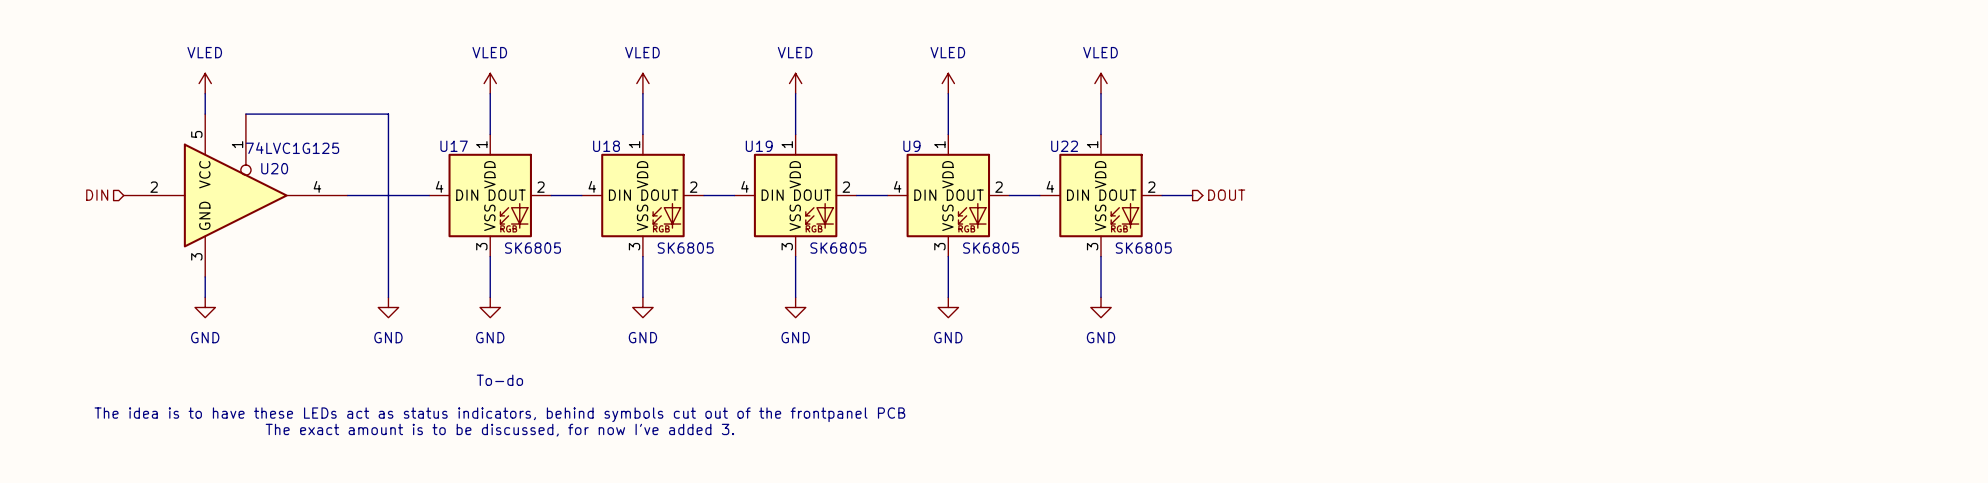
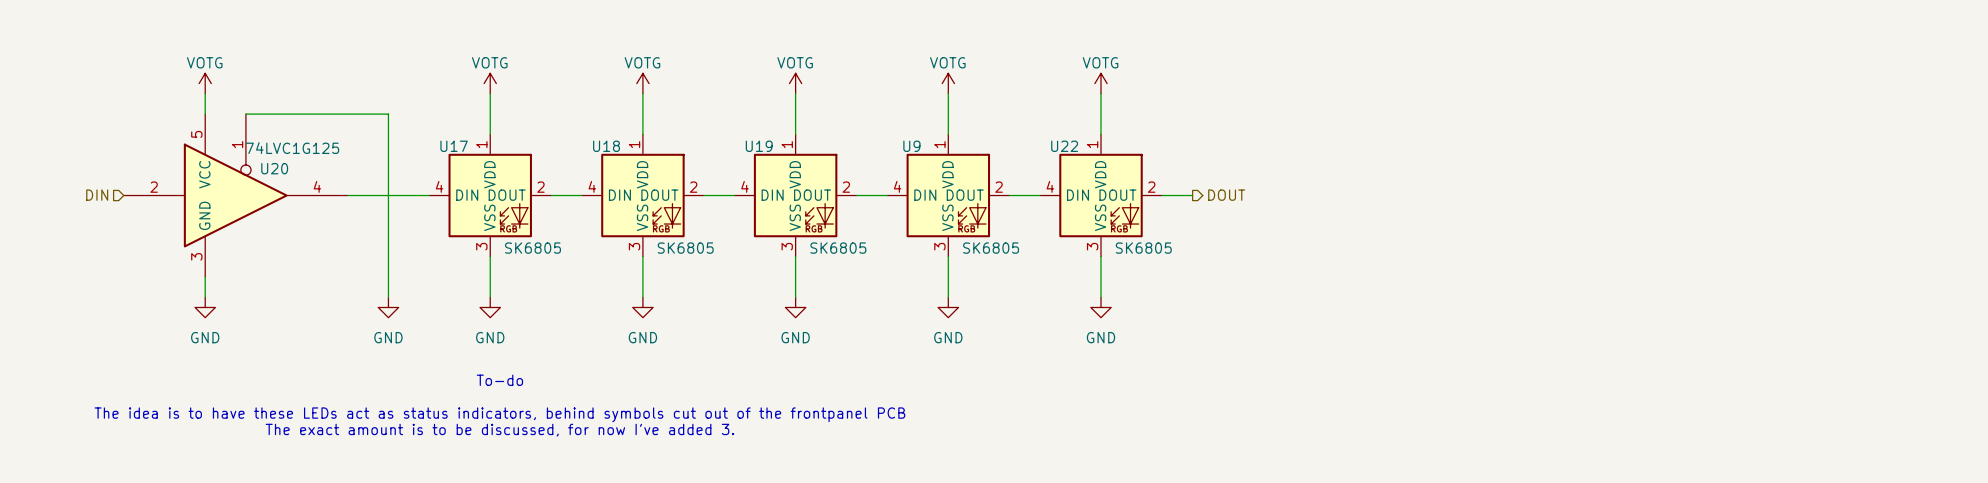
power symbol: VLED (205, 83) -> VOTG (205, 83)
power symbol: VLED (490, 83) -> VOTG (490, 83)
power symbol: VLED (642, 83) -> VOTG (642, 83)
power symbol: VLED (795, 83) -> VOTG (795, 83)
power symbol: VLED (948, 83) -> VOTG (948, 83)
power symbol: VLED (1101, 83) -> VOTG (1101, 83)

